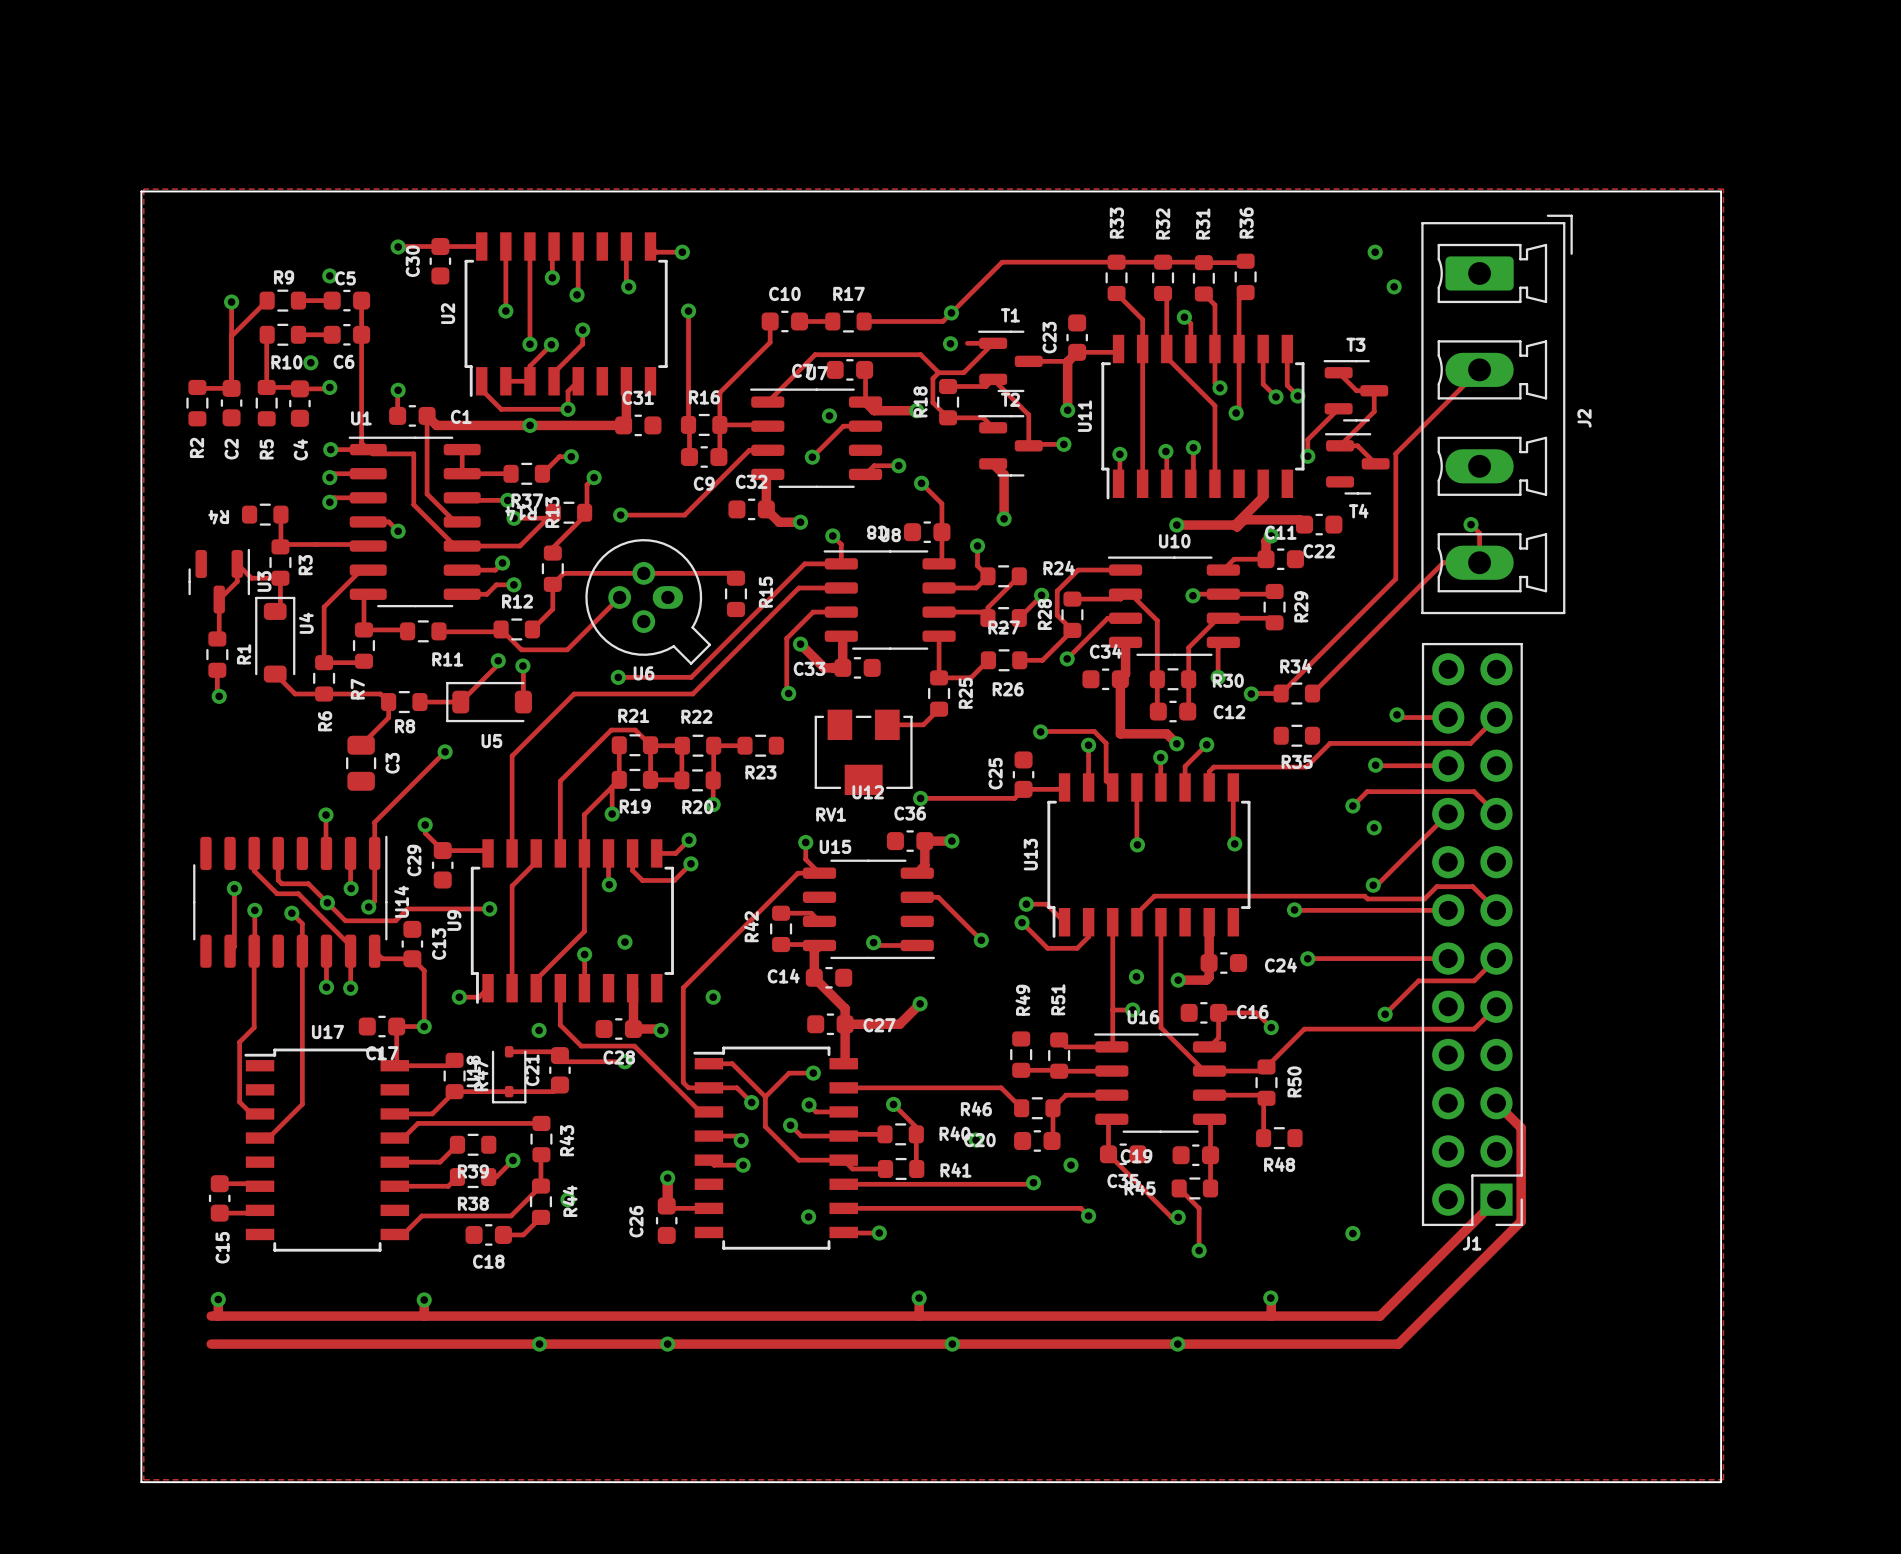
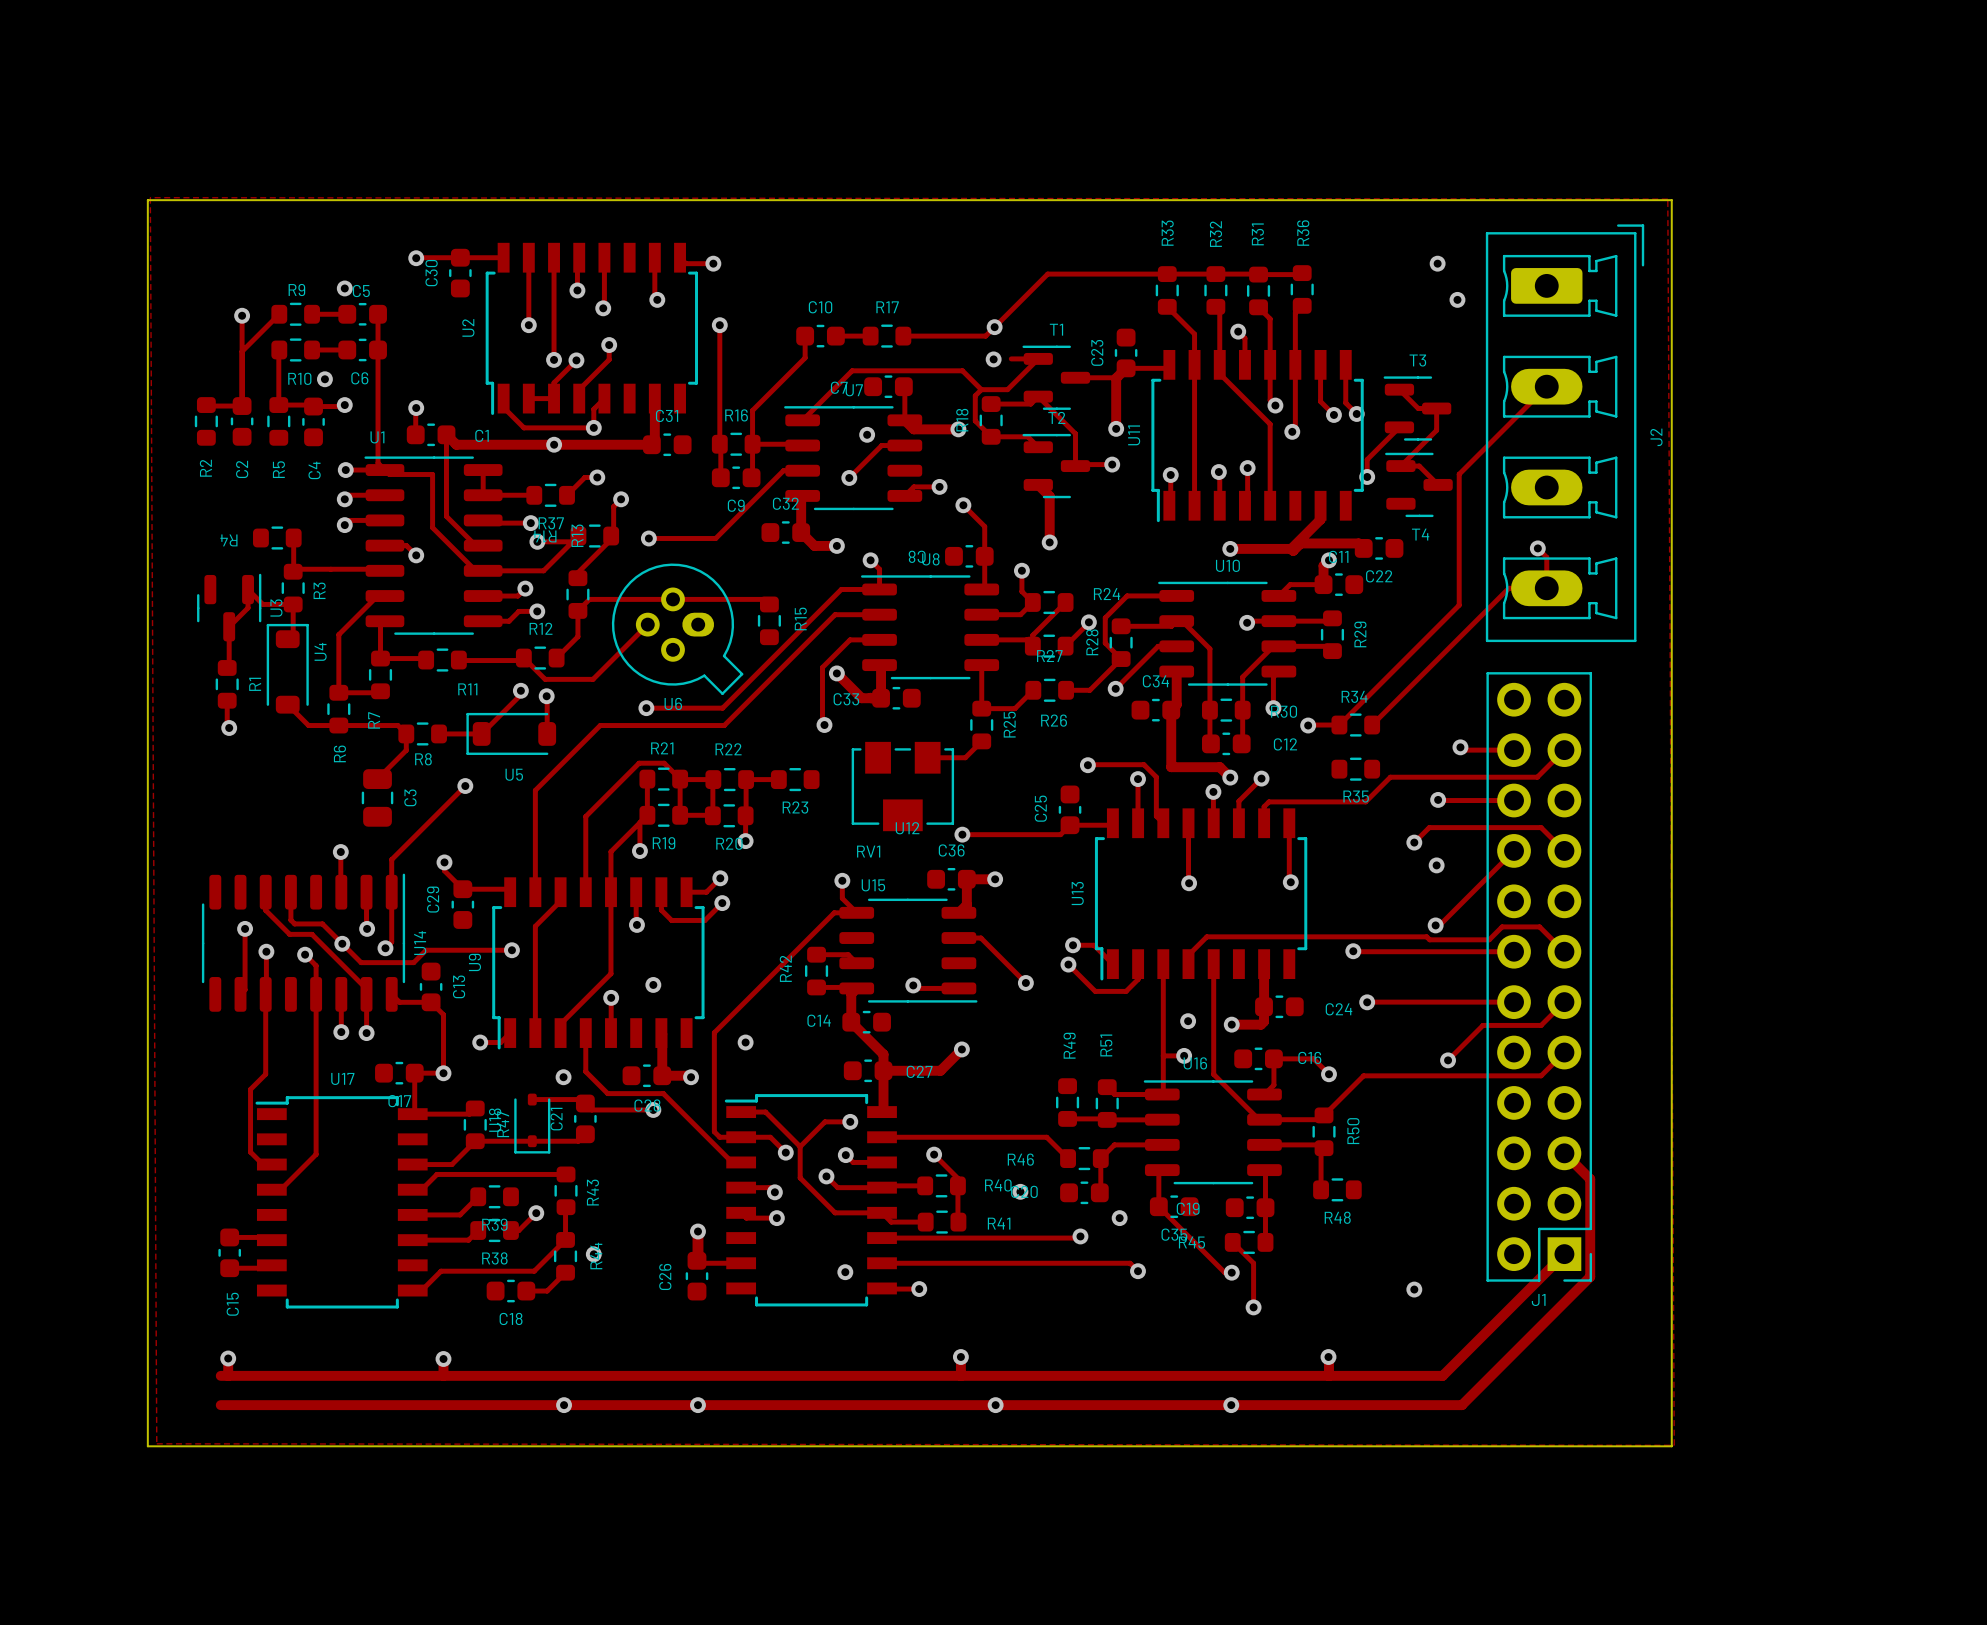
zone outline: (143, 189) (143, 1479) (1723, 1479) (1723, 189) (143, 189) -> (150, 197) (156, 1443) (1674, 1445) (1667, 199) (150, 197)
board edge: (1599, 191) (1721, 191) (1721, 1482) (141, 1482) (141, 1383) -> (1671, 200) (1671, 1446) (147, 1446)

